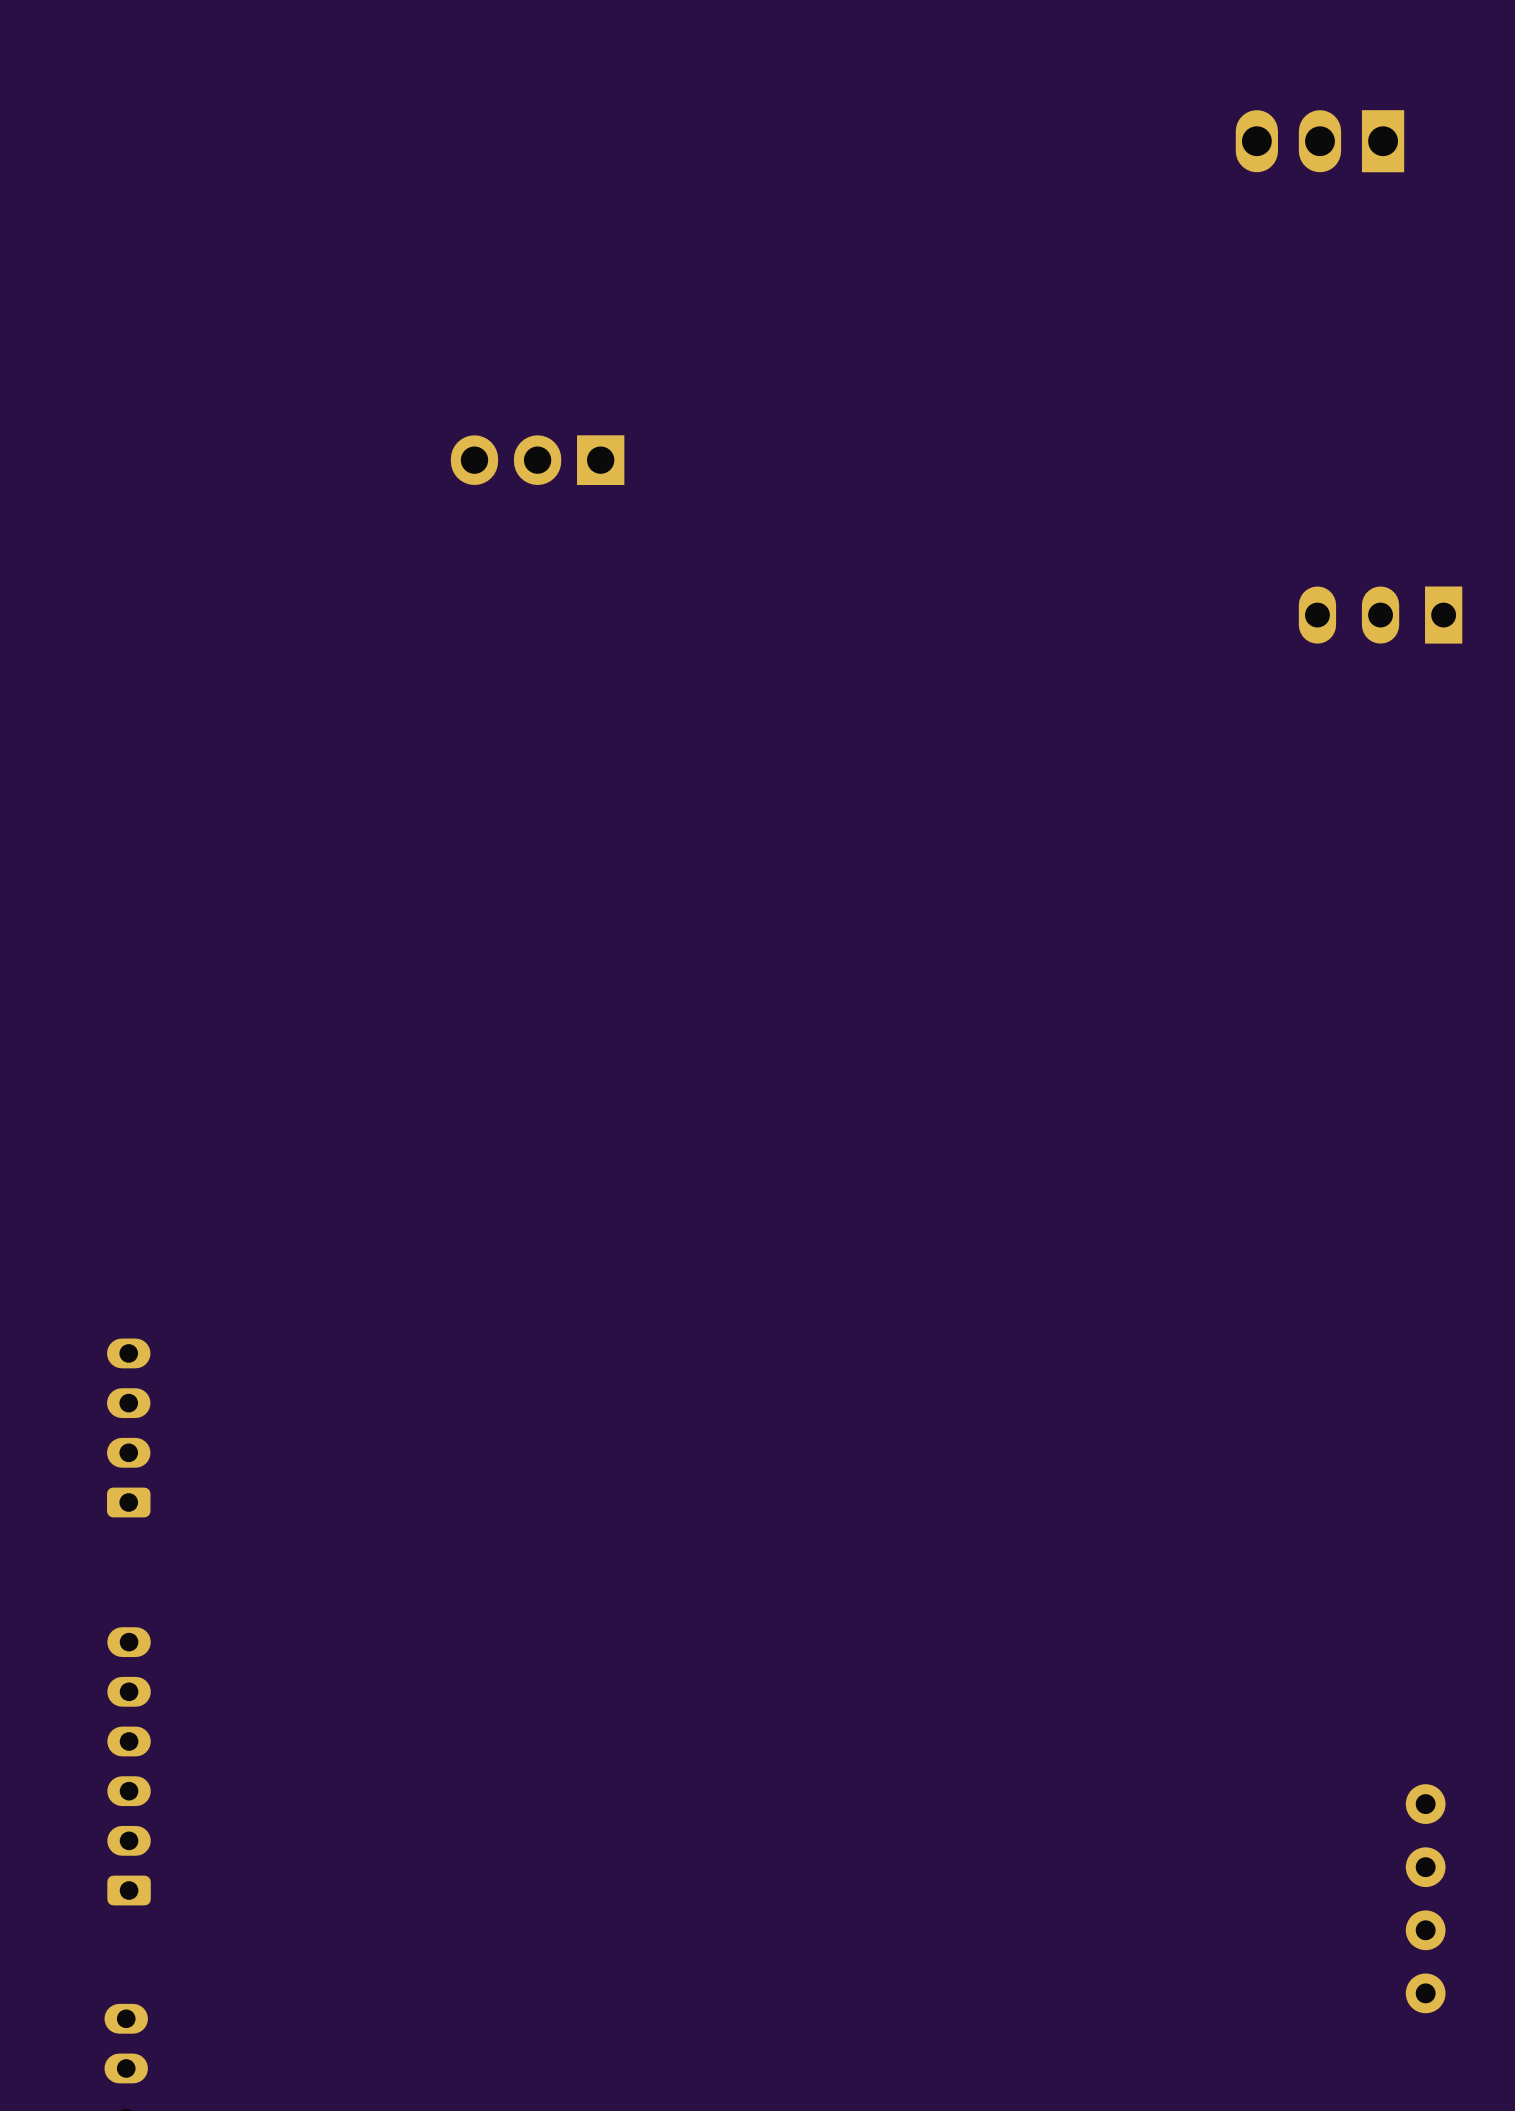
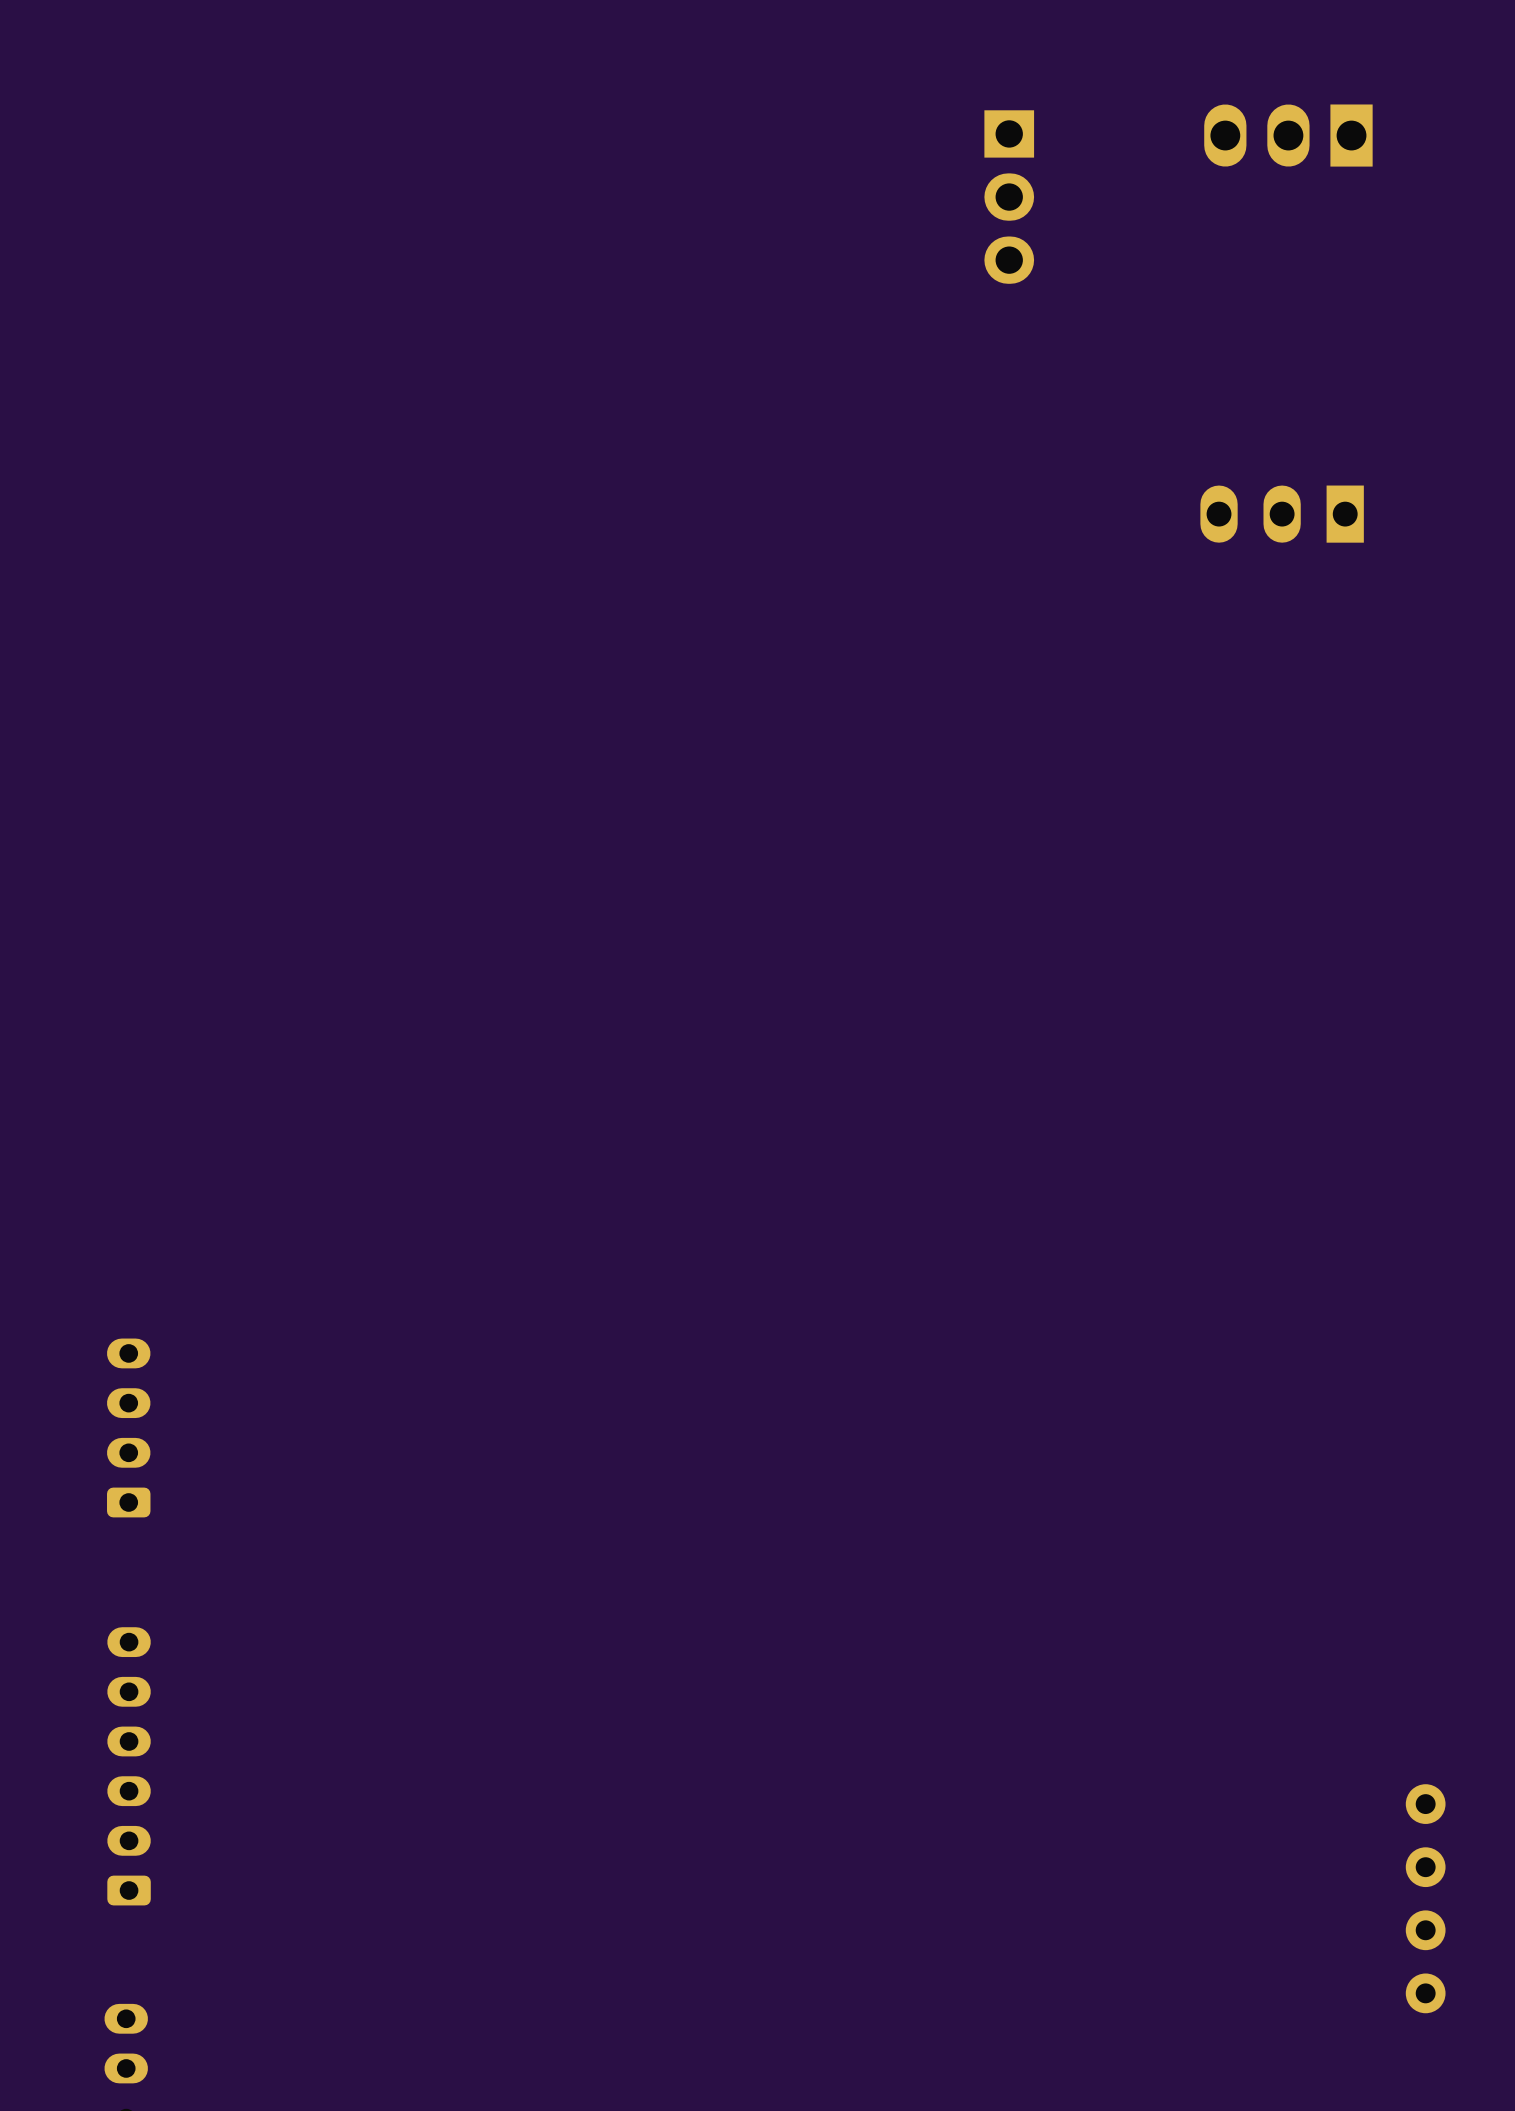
part position: (1319, 141) -> (1288, 135)
part rotation: 0° (537, 460) -> 90° counterclockwise (1009, 197)
part position: (537, 460) -> (1009, 197)
part position: (1380, 615) -> (1282, 514)

